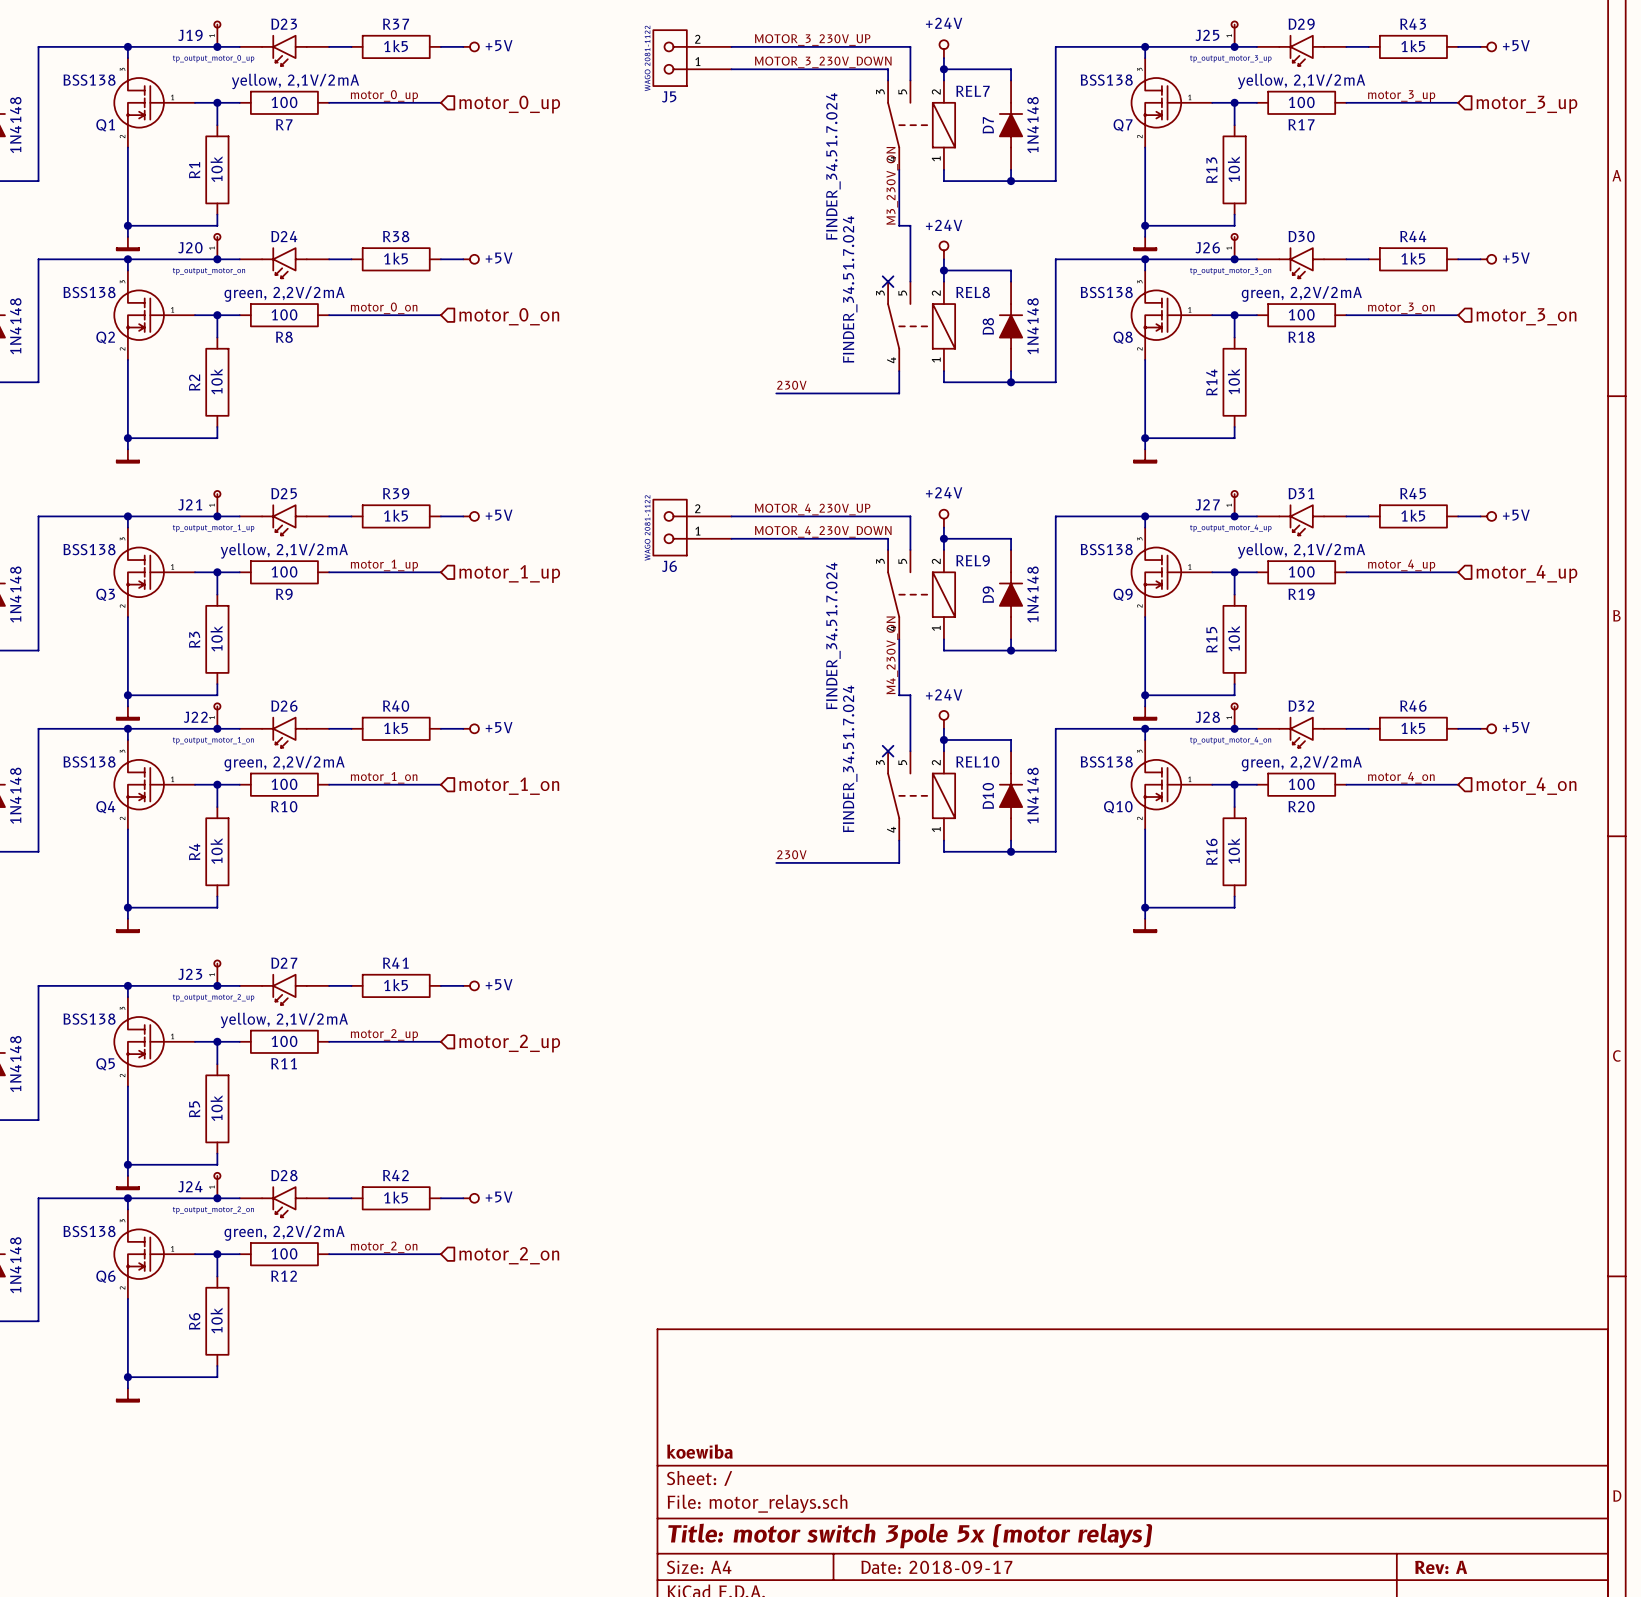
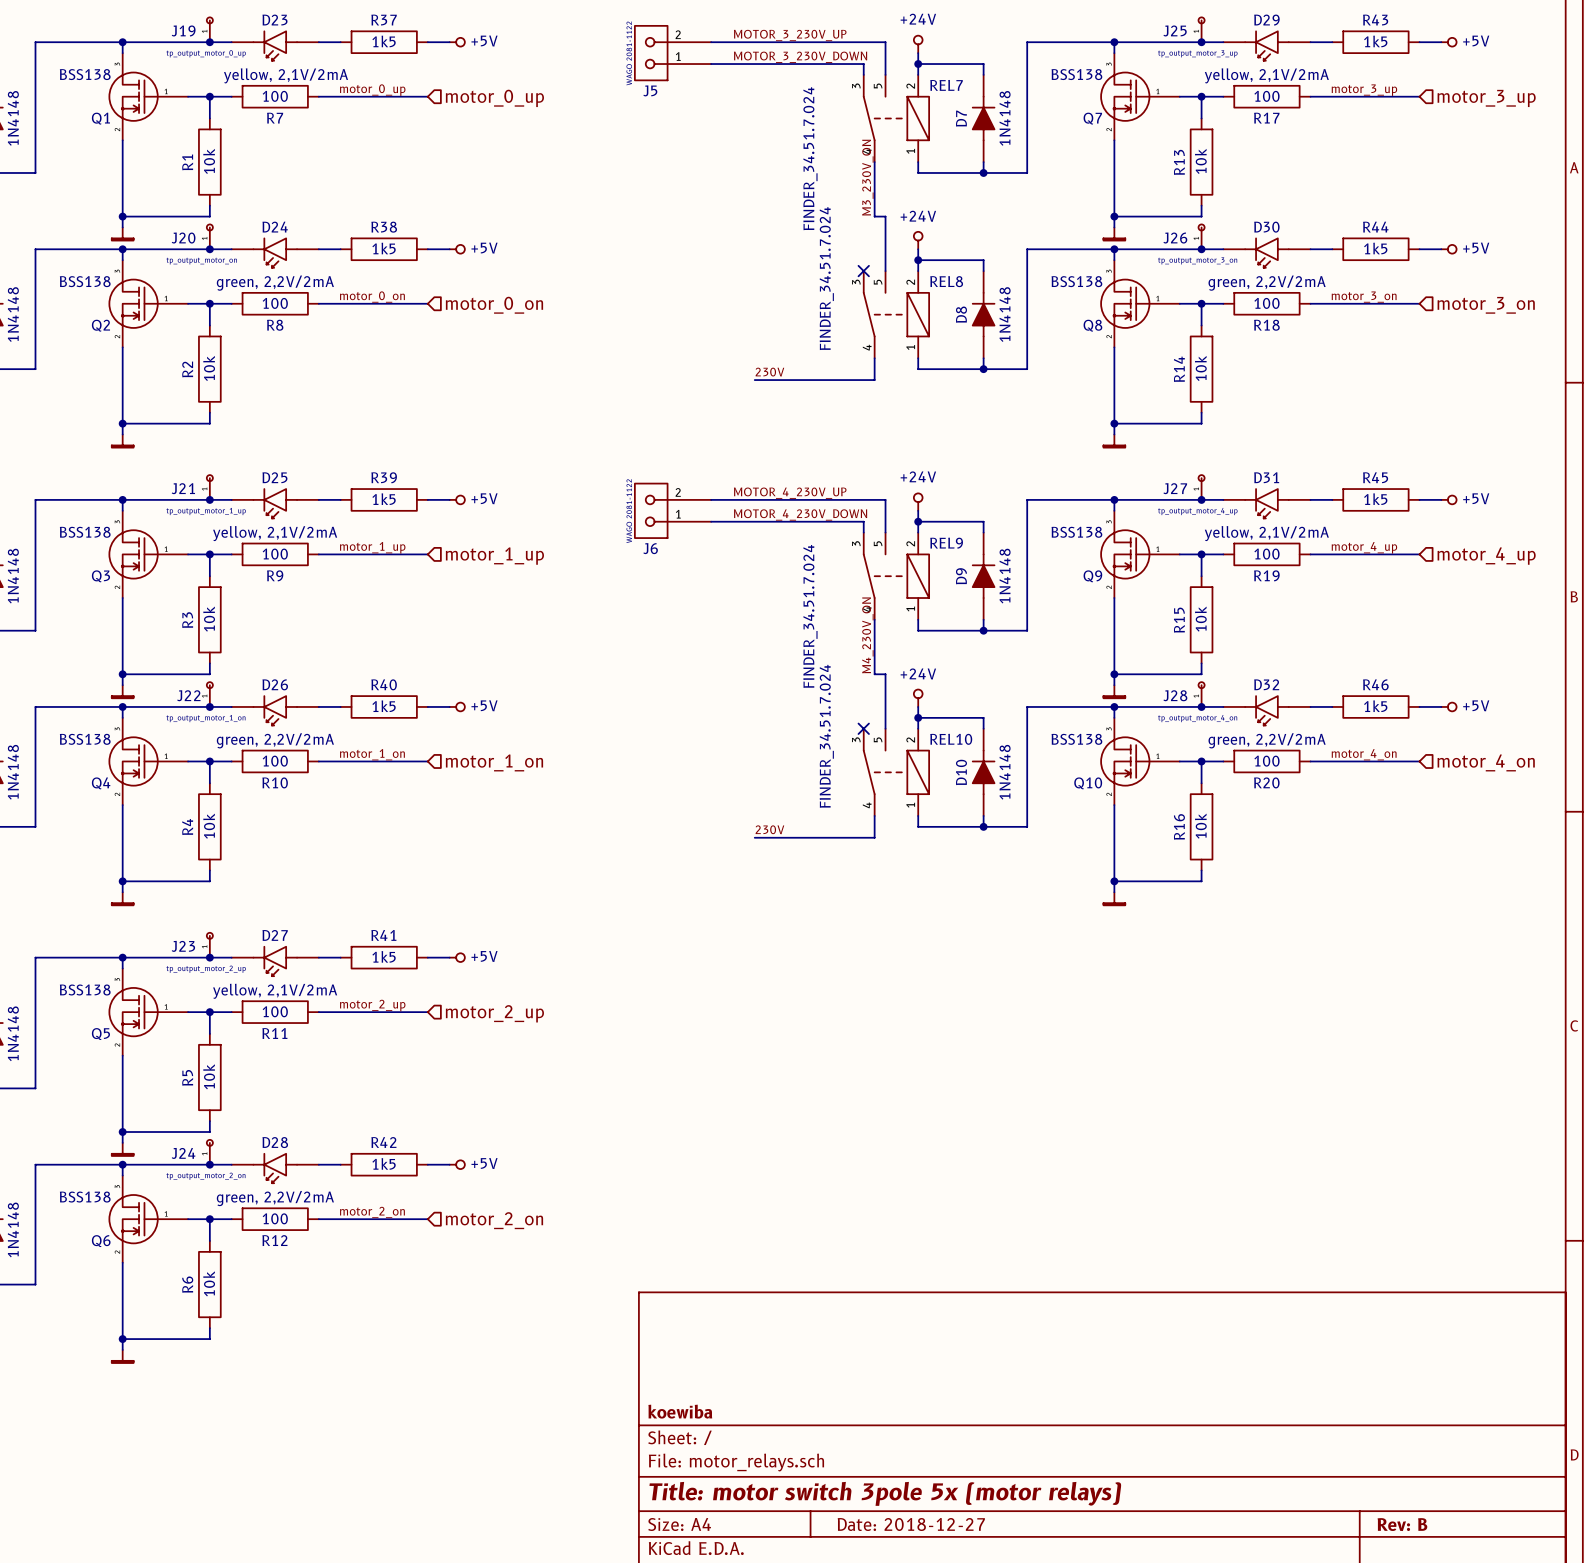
title block: Date: 2018-09-17 (936, 1567) -> Date: 2018-12-27 (911, 1524)
title block: Rev: A (1441, 1567) -> Rev: B (1402, 1524)

